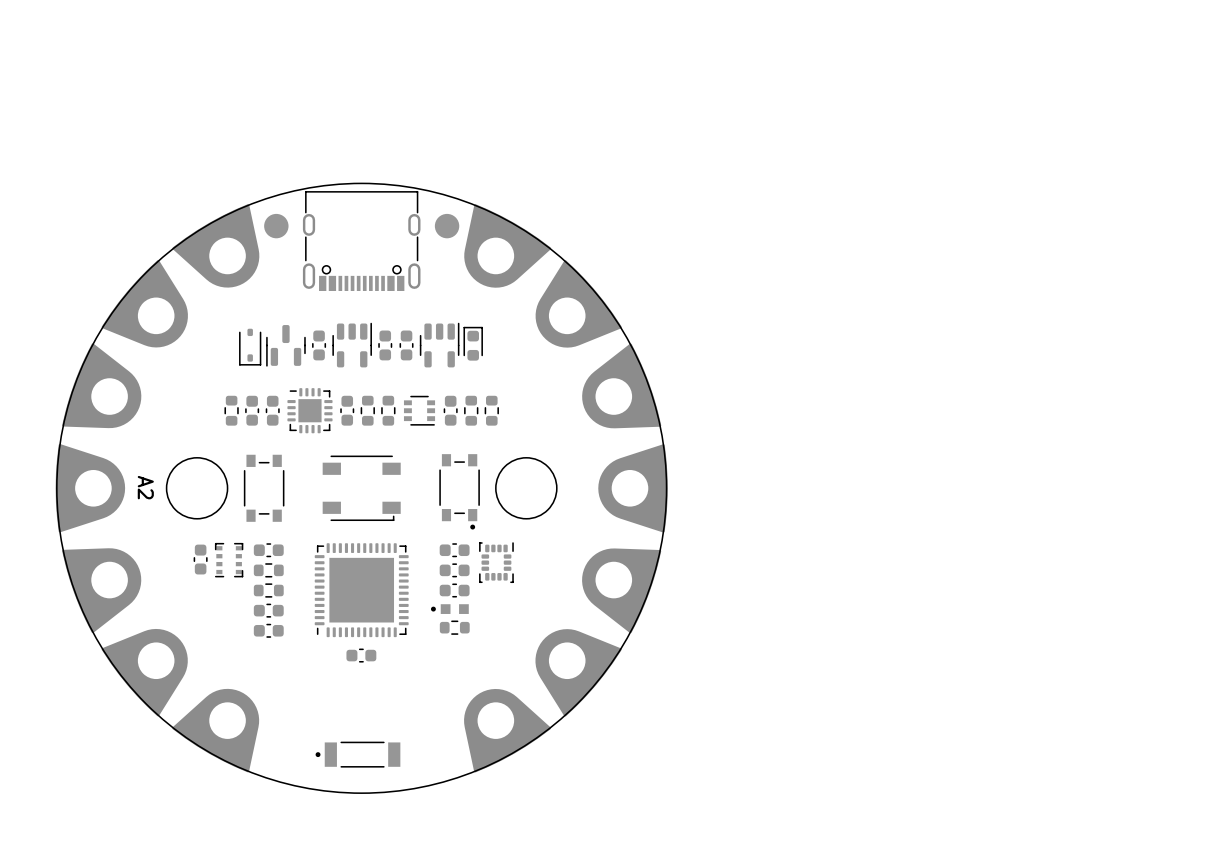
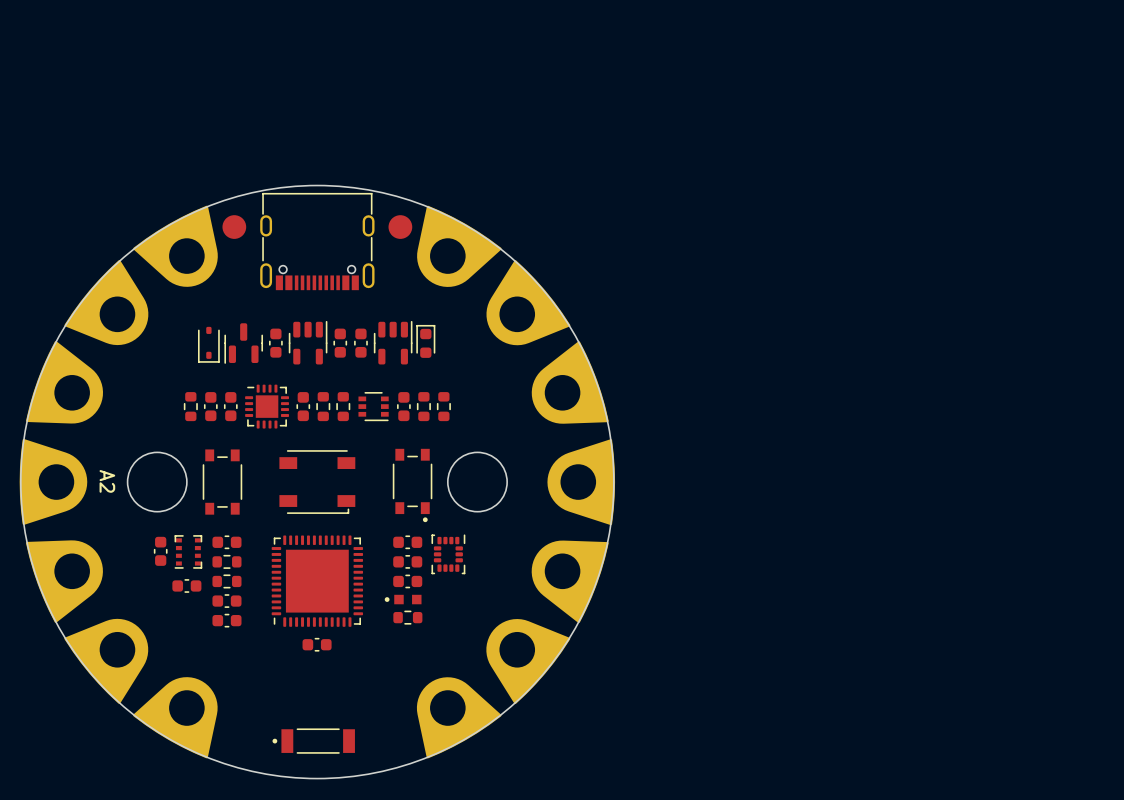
part: none -> (186, 585)

